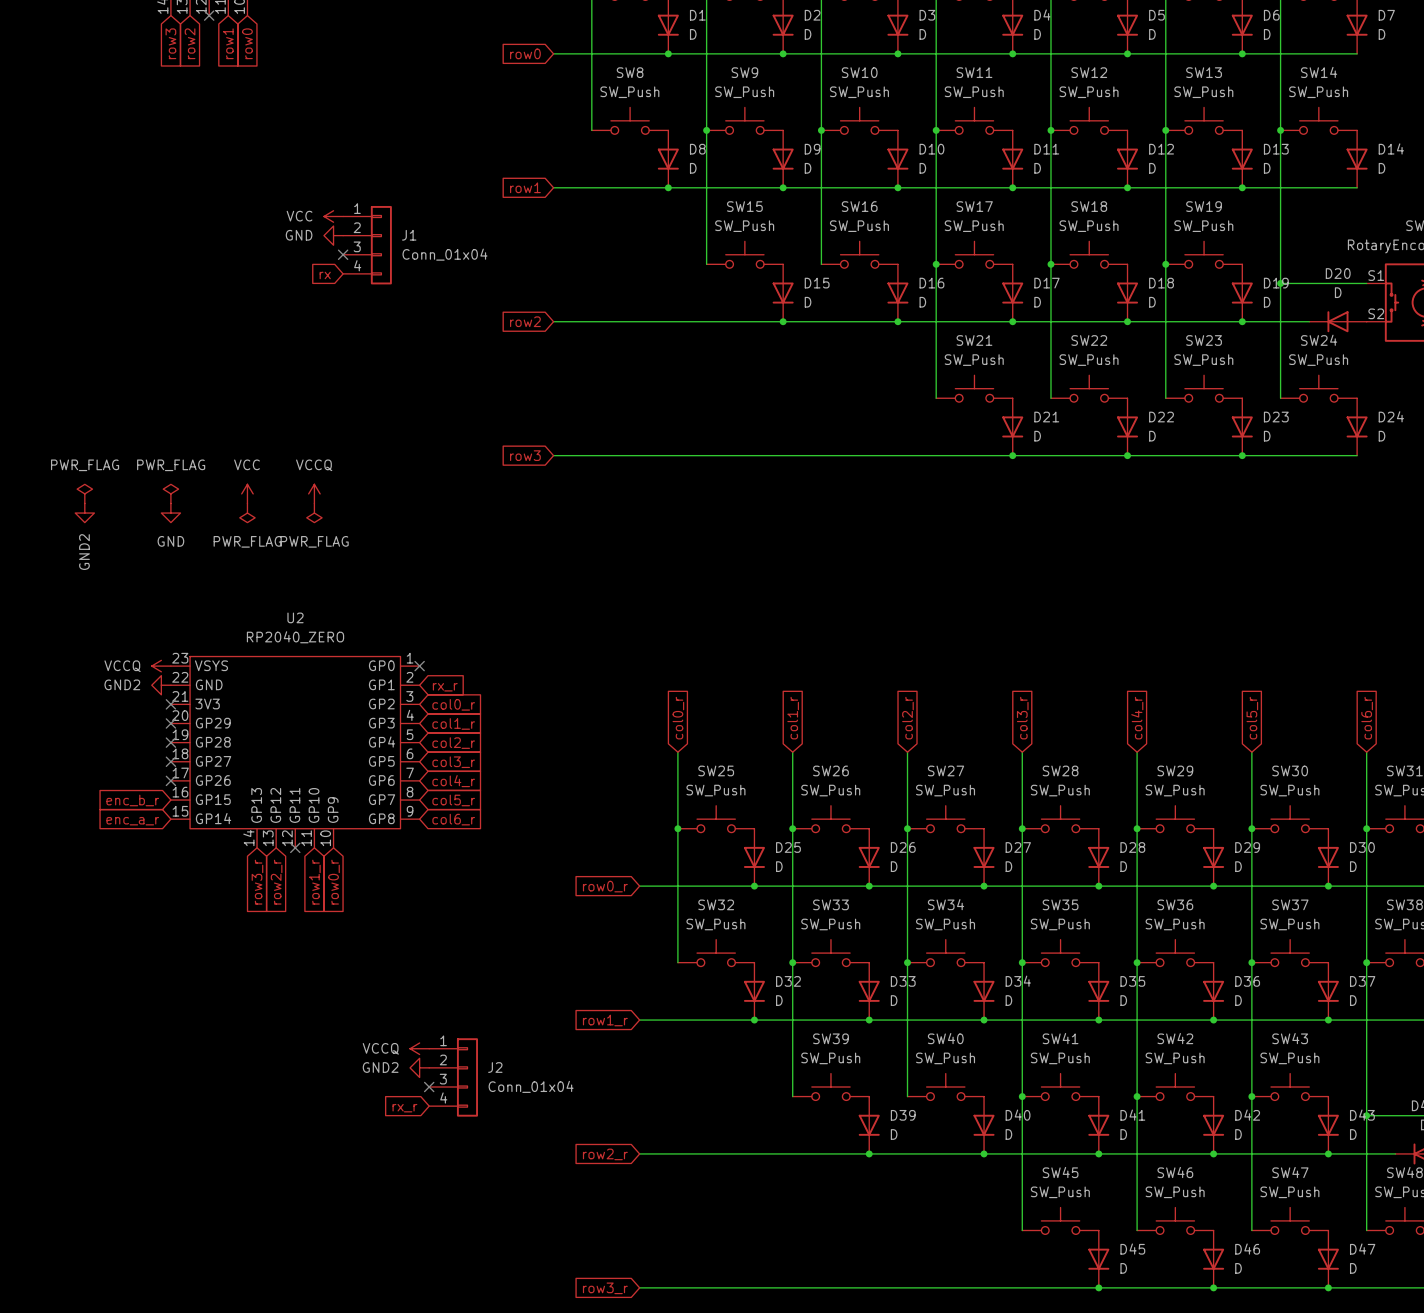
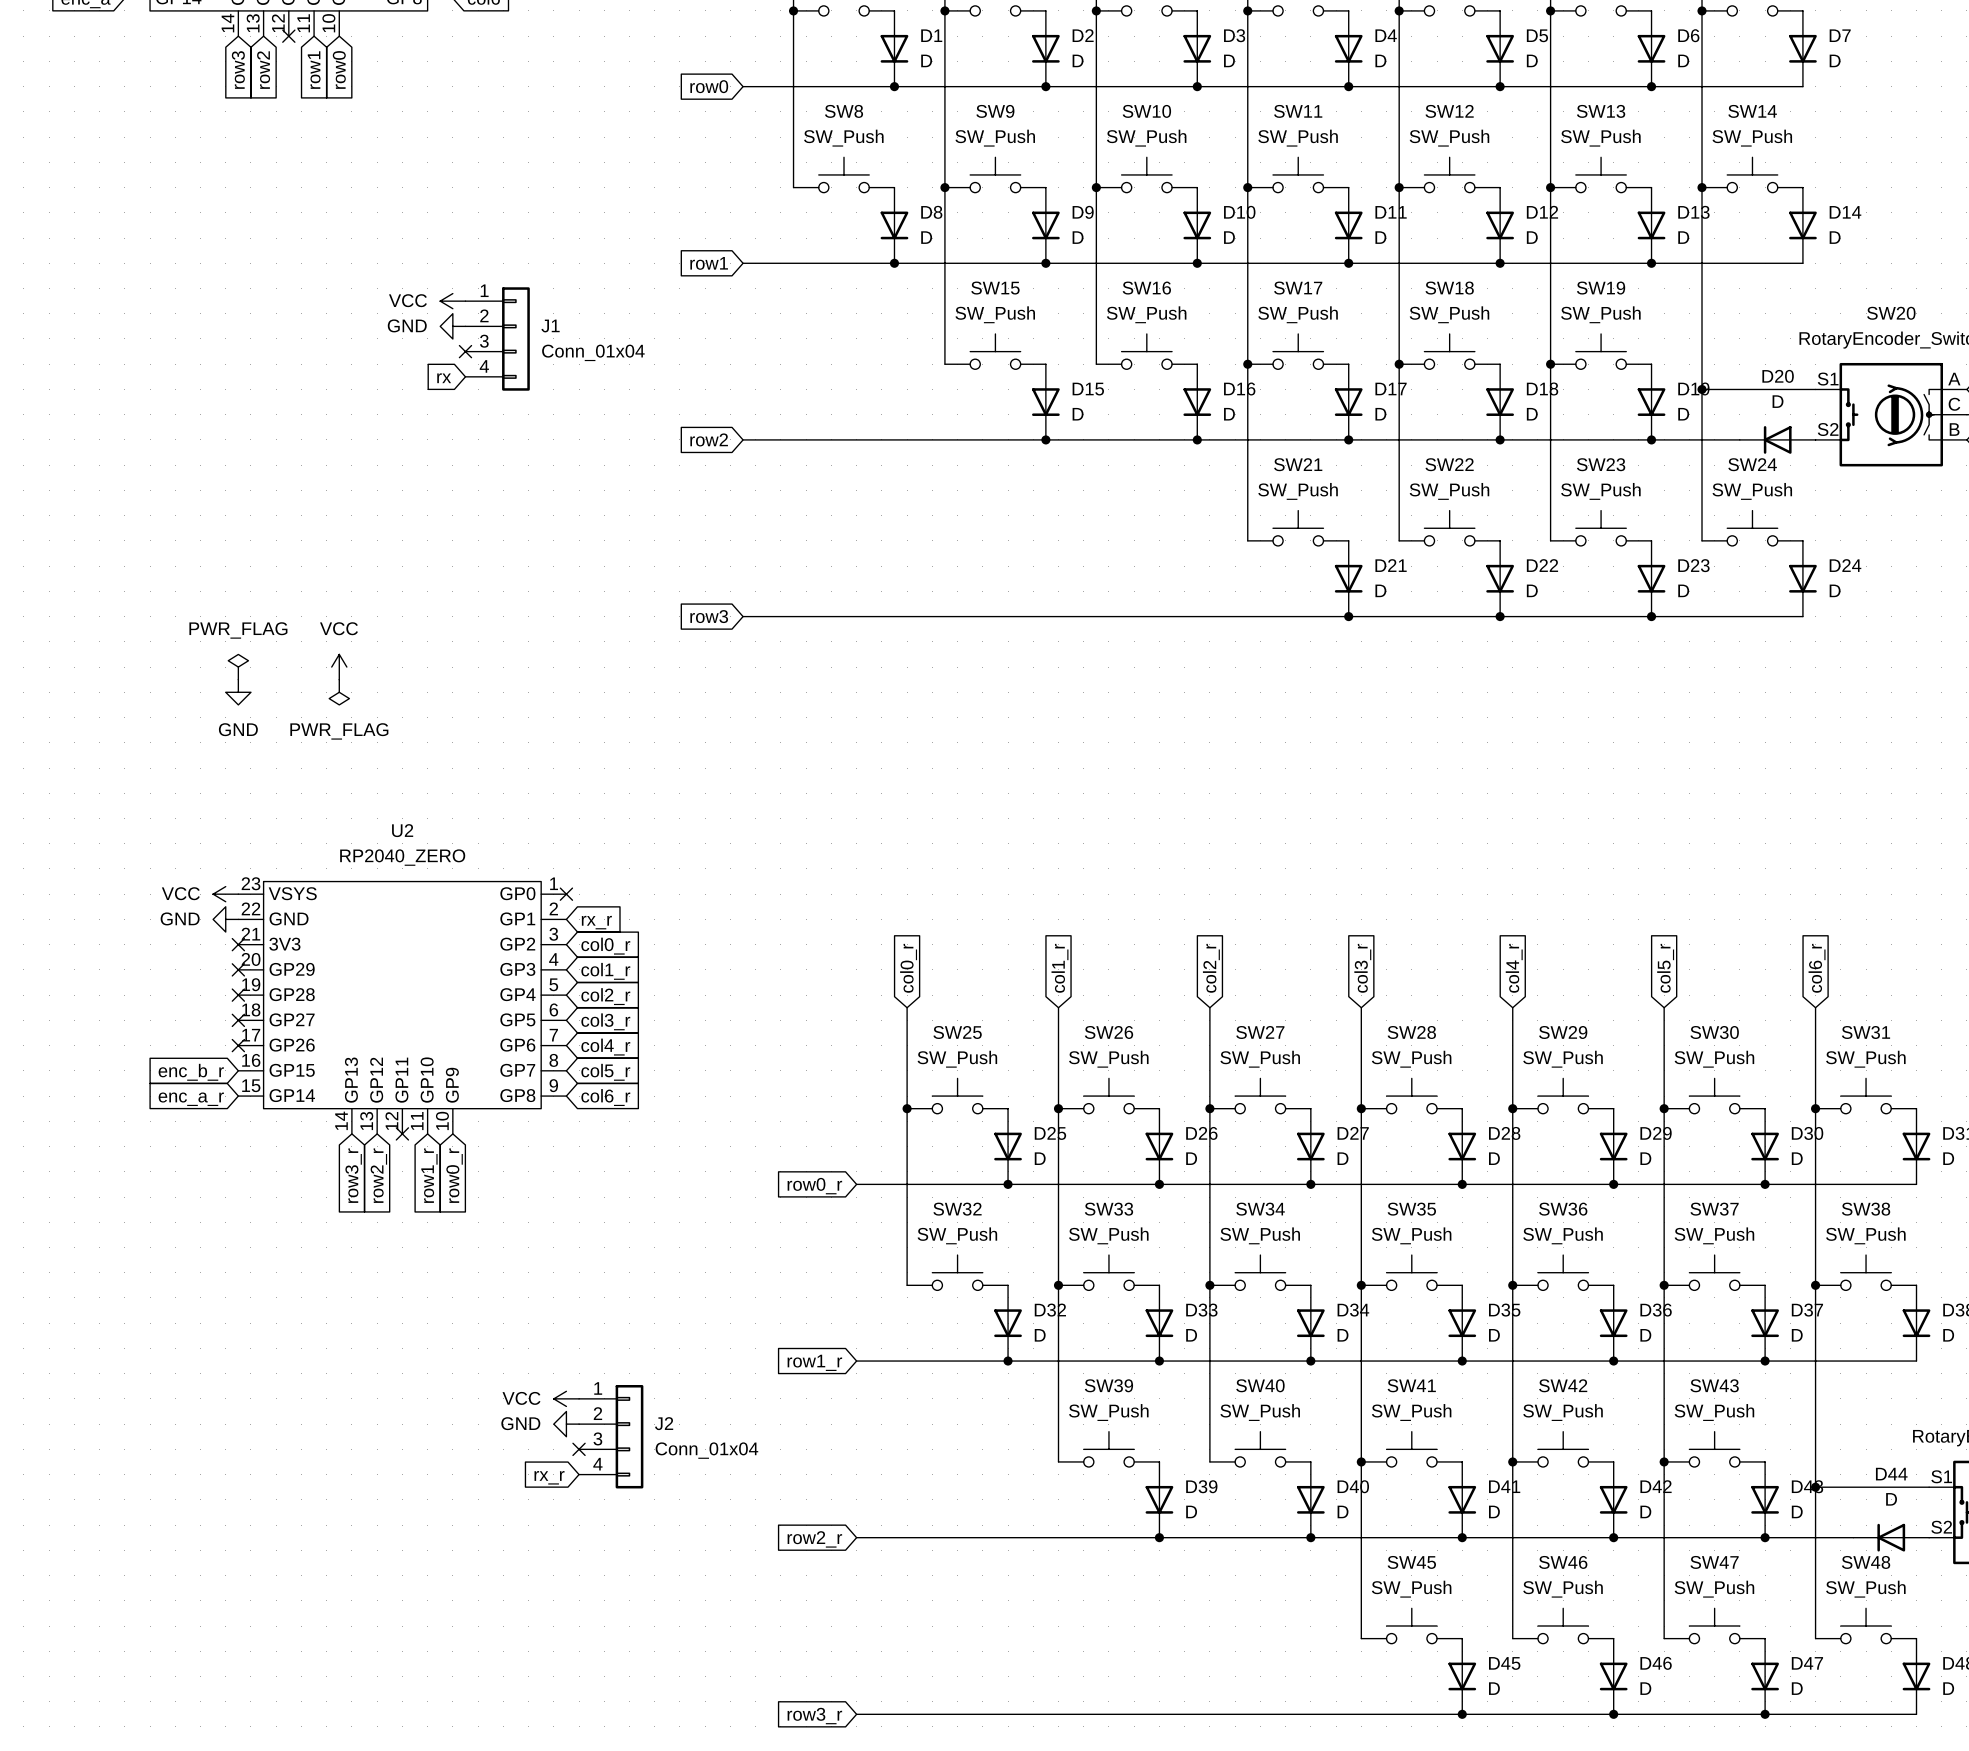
power symbol: PWR_FLAG (84, 493) -> none
power symbol: VCCQ (314, 493) -> none
power symbol: GND2 (84, 513) -> none
power symbol: PWR_FLAG (314, 513) -> none
power symbol: VCCQ (161, 666) -> VCC (225, 894)
power symbol: GND2 (161, 685) -> GND (225, 919)
power symbol: VCCQ (419, 1048) -> VCC (566, 1398)
power symbol: GND2 (419, 1067) -> GND (566, 1424)

